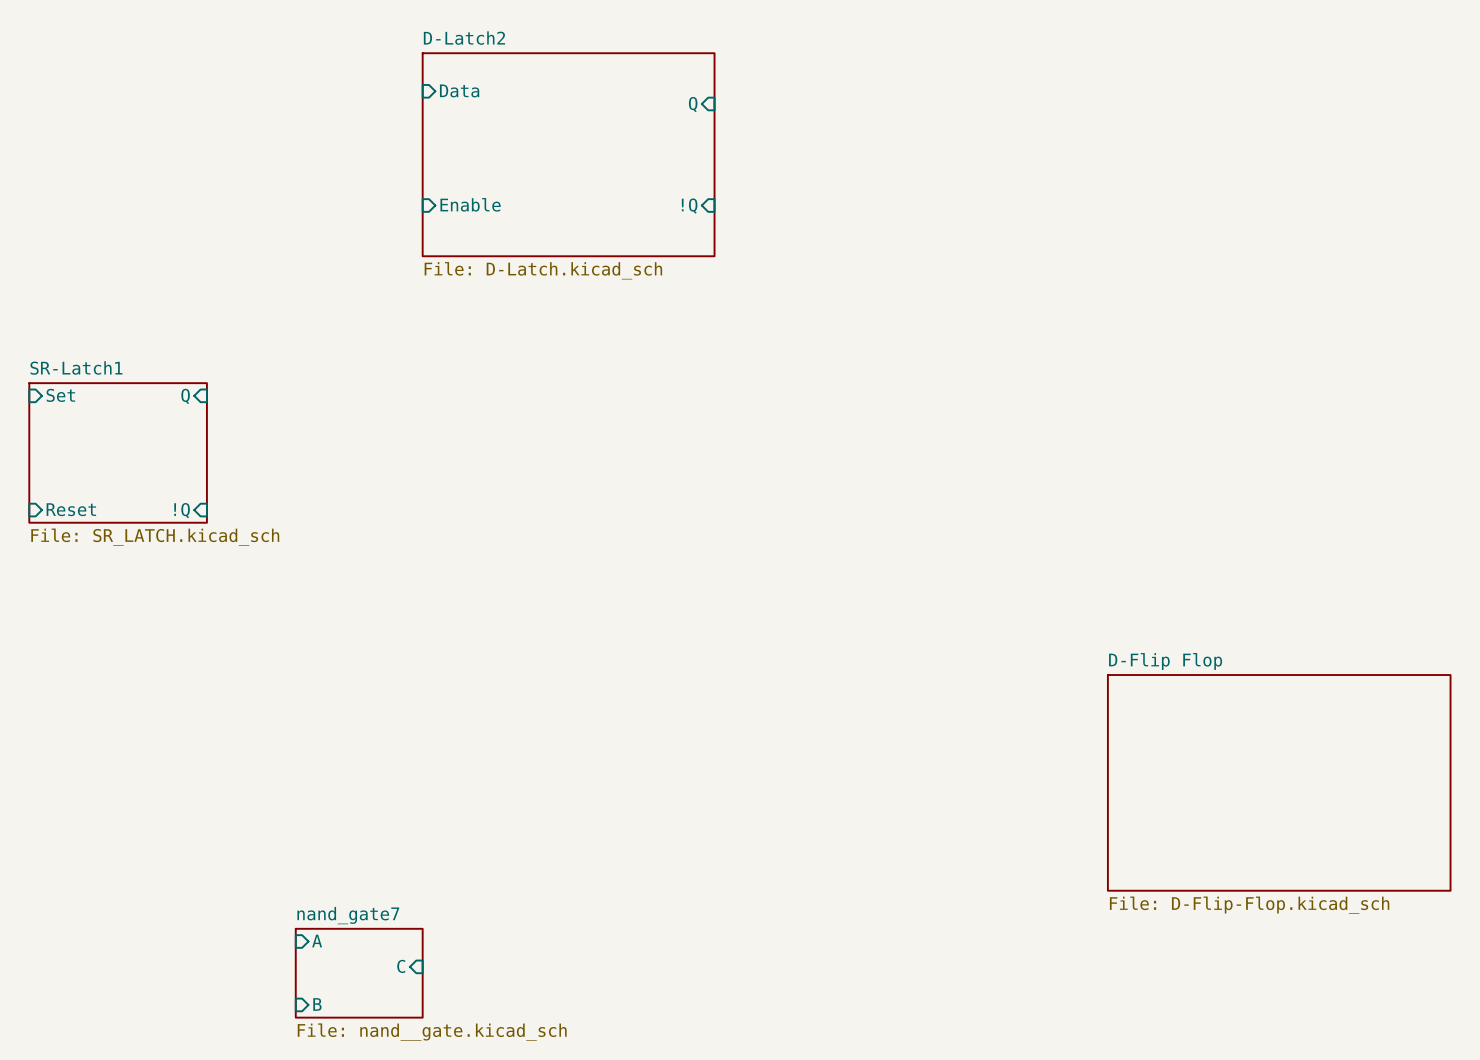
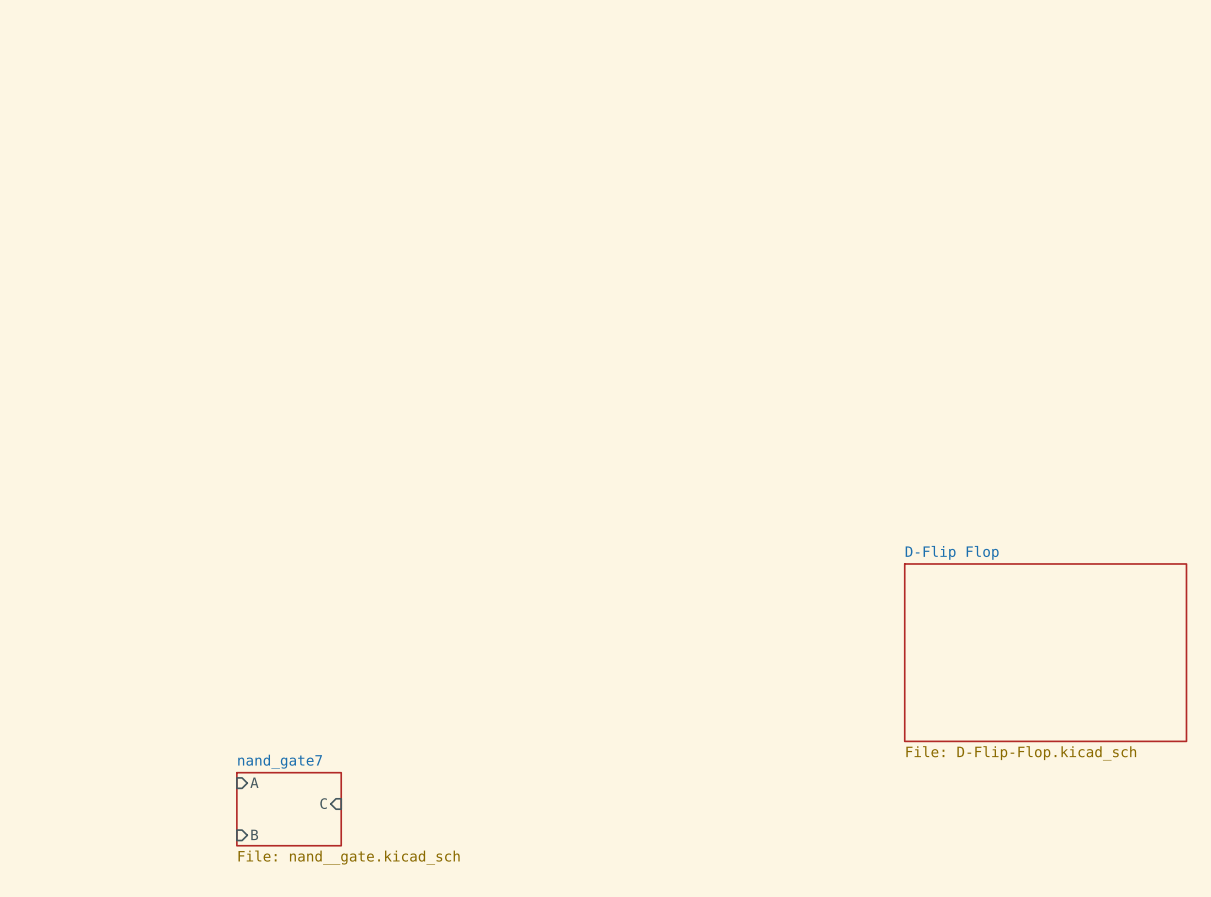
sheet pin: Data (459, 90) -> none
sheet pin: Q (693, 104) -> none
sheet D-Latch2: File: D-Latch.kicad_sch (568, 154) -> none
sheet pin: Enable (470, 204) -> none
sheet pin: !Q (689, 206) -> none
sheet pin: Set (60, 395) -> none
sheet pin: Q (185, 396) -> none
sheet SR-Latch1: File: SR_LATCH.kicad_sch (118, 452) -> none
sheet pin: Reset (71, 509) -> none
sheet pin: !Q (182, 510) -> none

